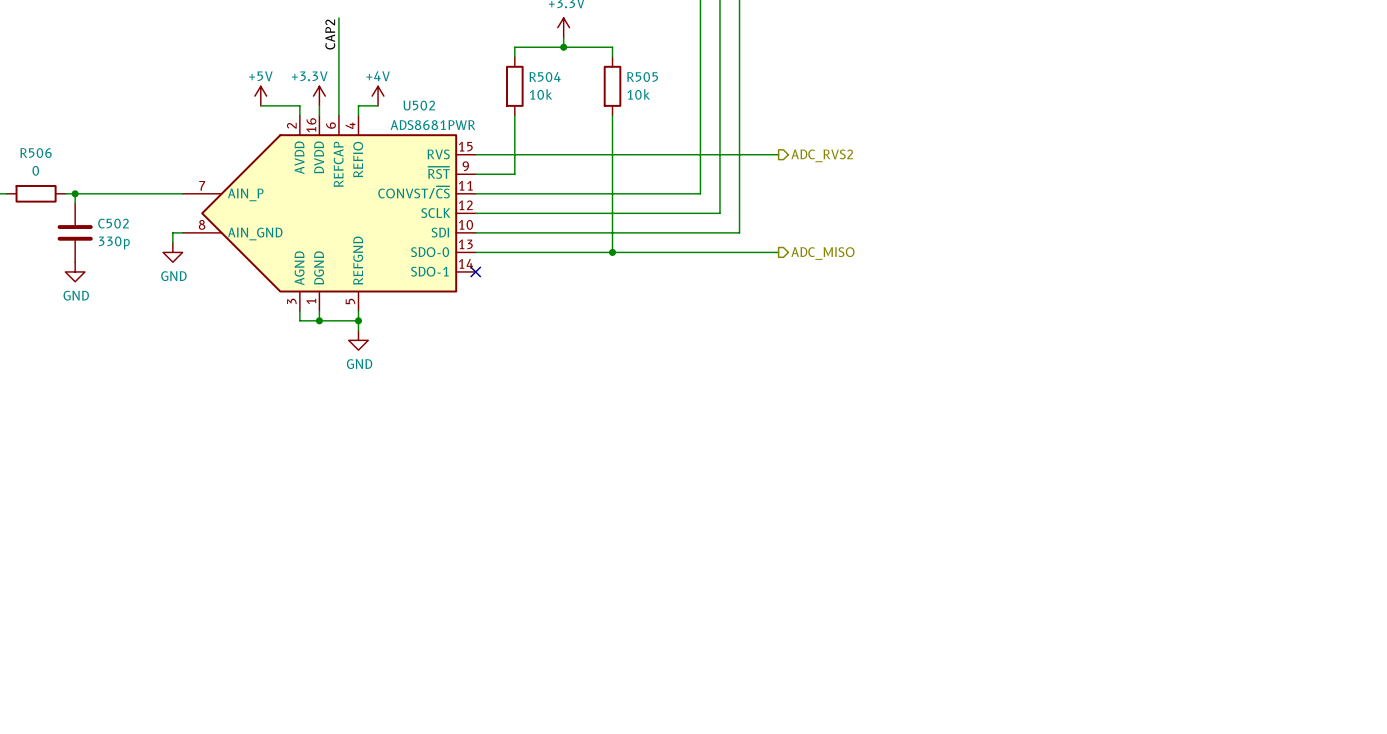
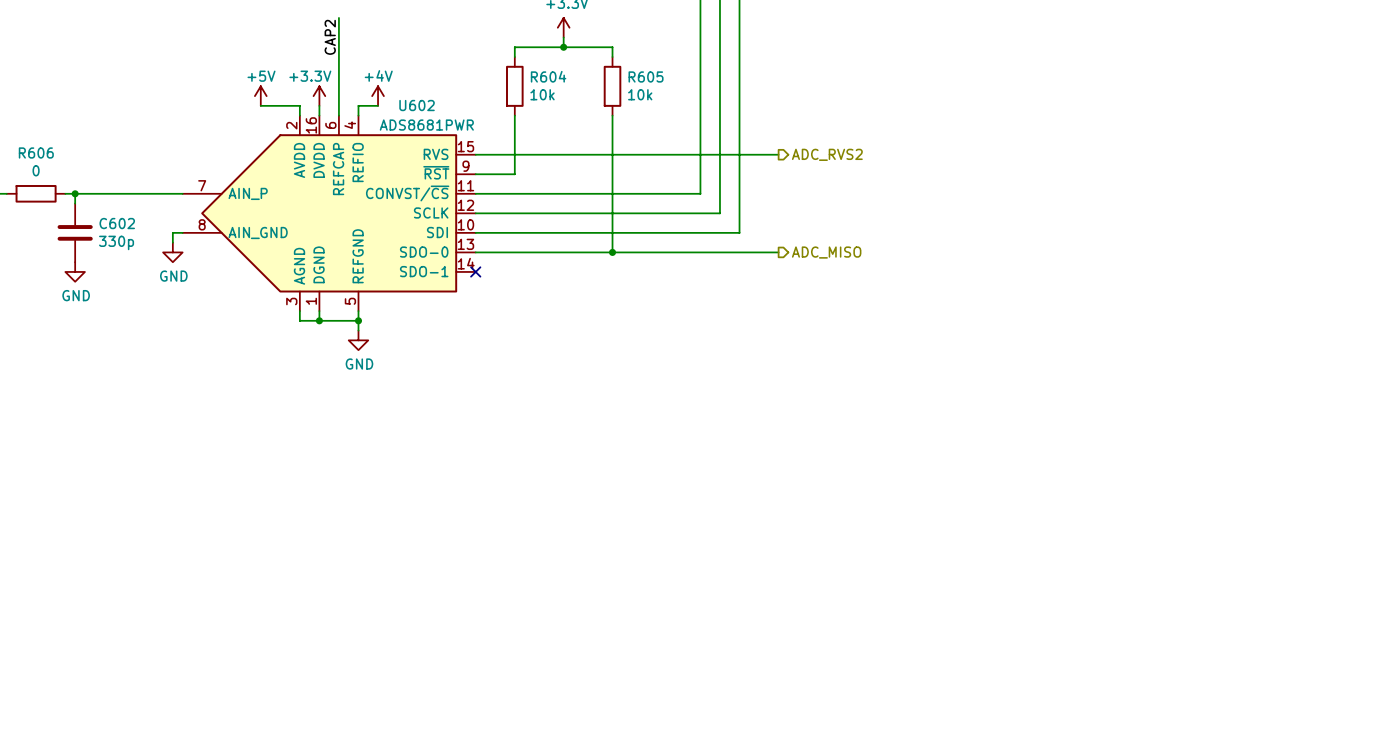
R504 name: R504 (545, 77) -> R604 (548, 76)
R505 name: R505 (642, 77) -> R605 (646, 76)
U502 name: U502 (419, 105) -> U602 (417, 105)
R506 name: R506 (36, 153) -> R606 (36, 152)
C502 name: C502 (113, 223) -> C602 (117, 223)

